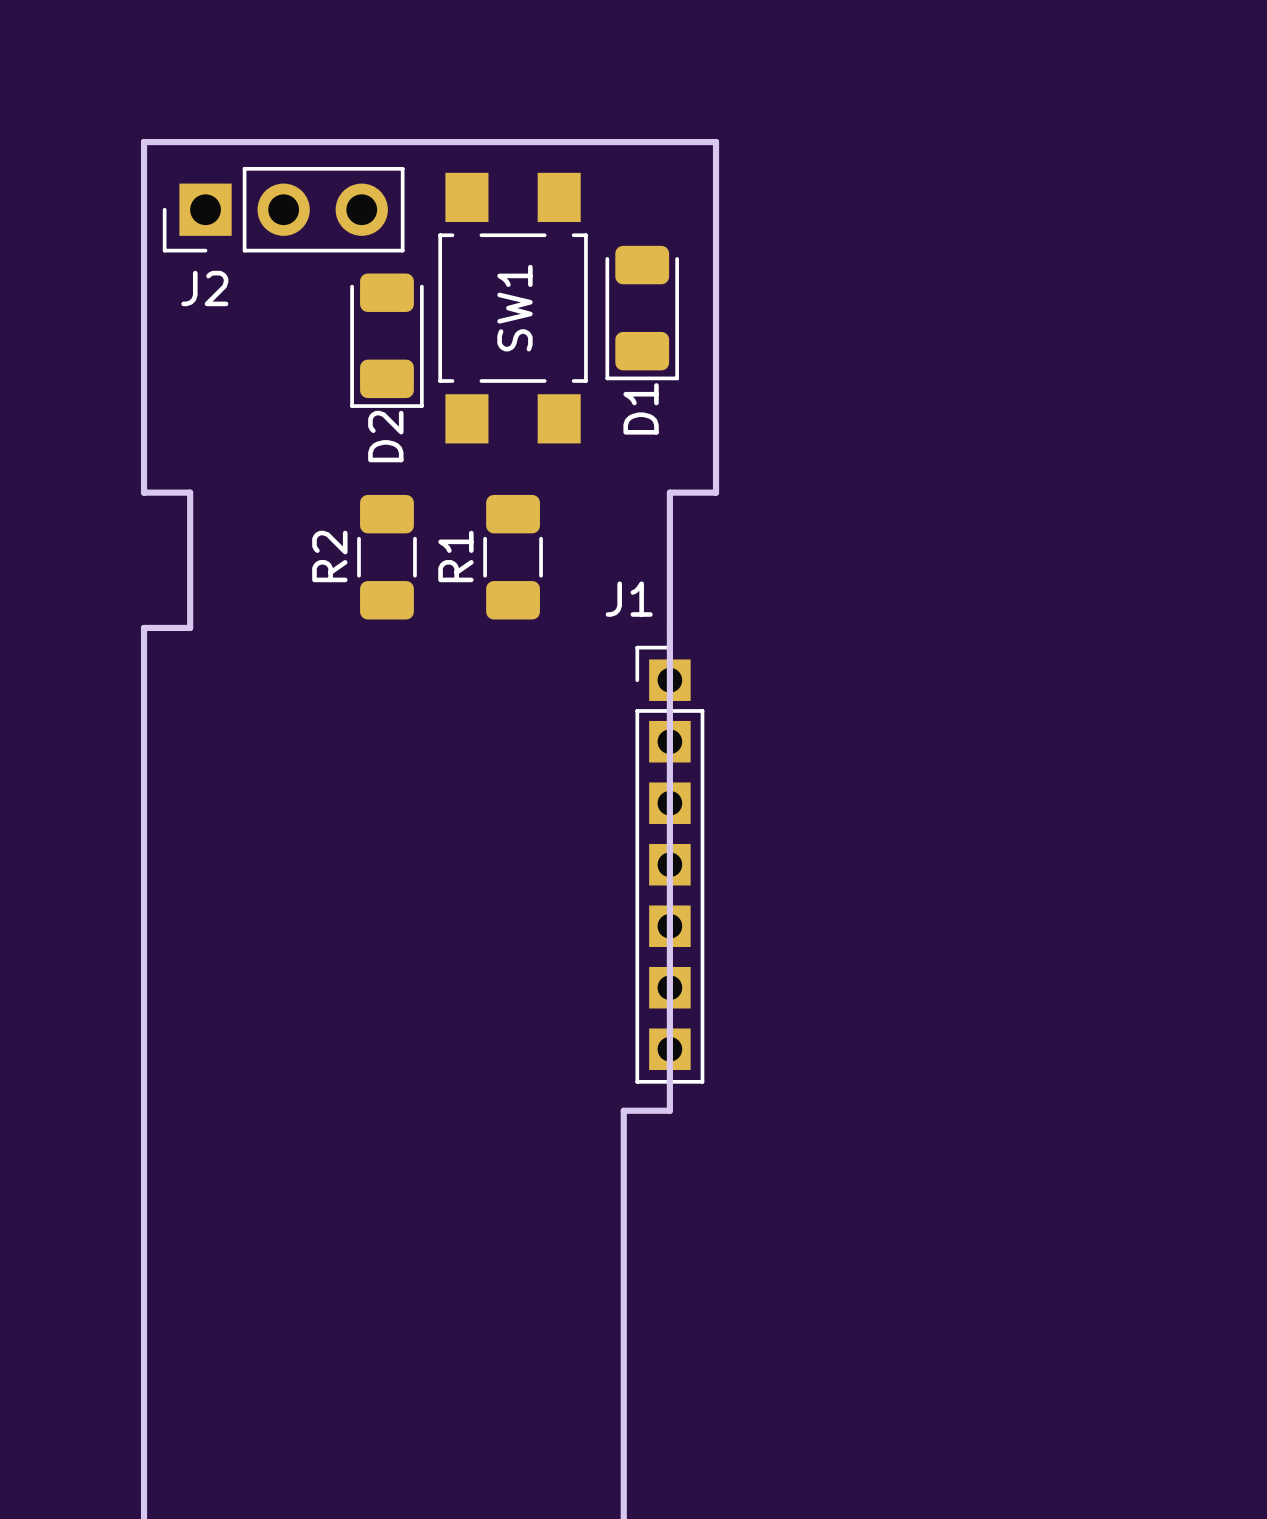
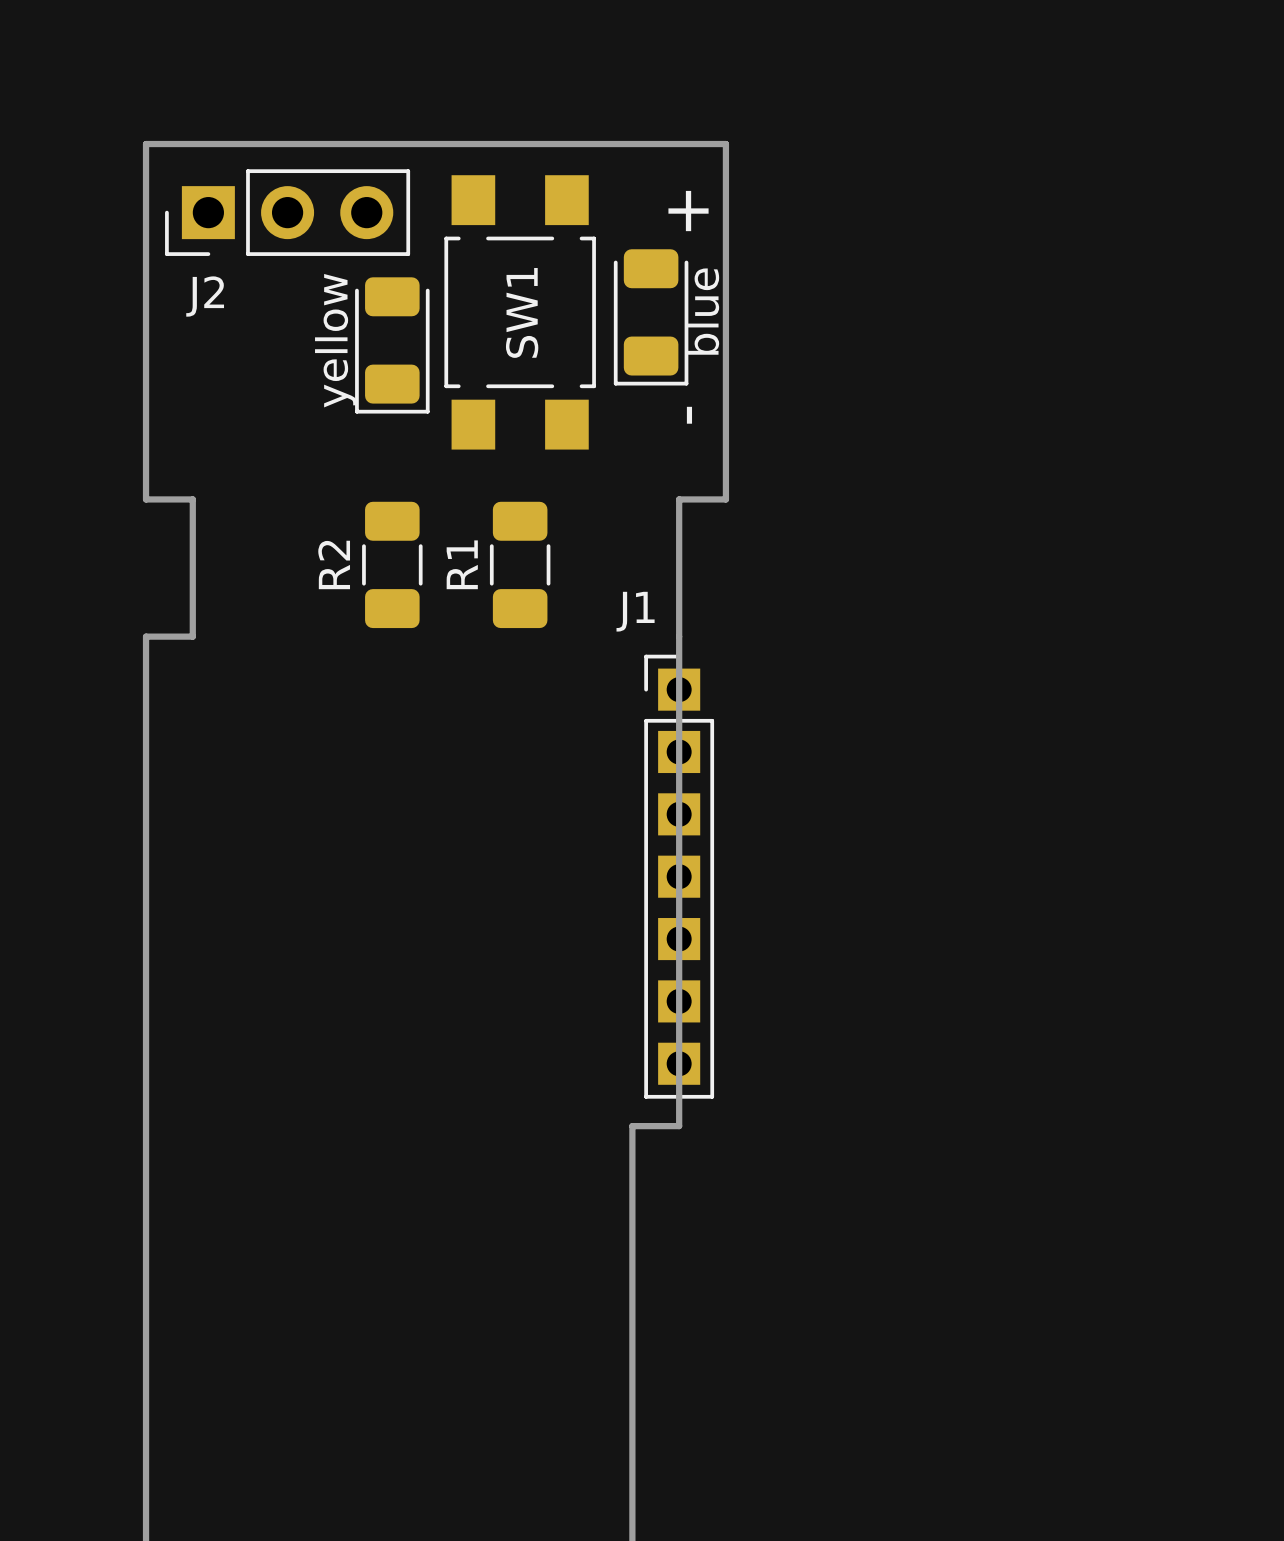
text: none -> + (688, 211)
D1 name: D1 (641, 408) -> blue (702, 311)
text: none -> - (689, 415)
D2 name: D2 (385, 436) -> yellow (335, 340)

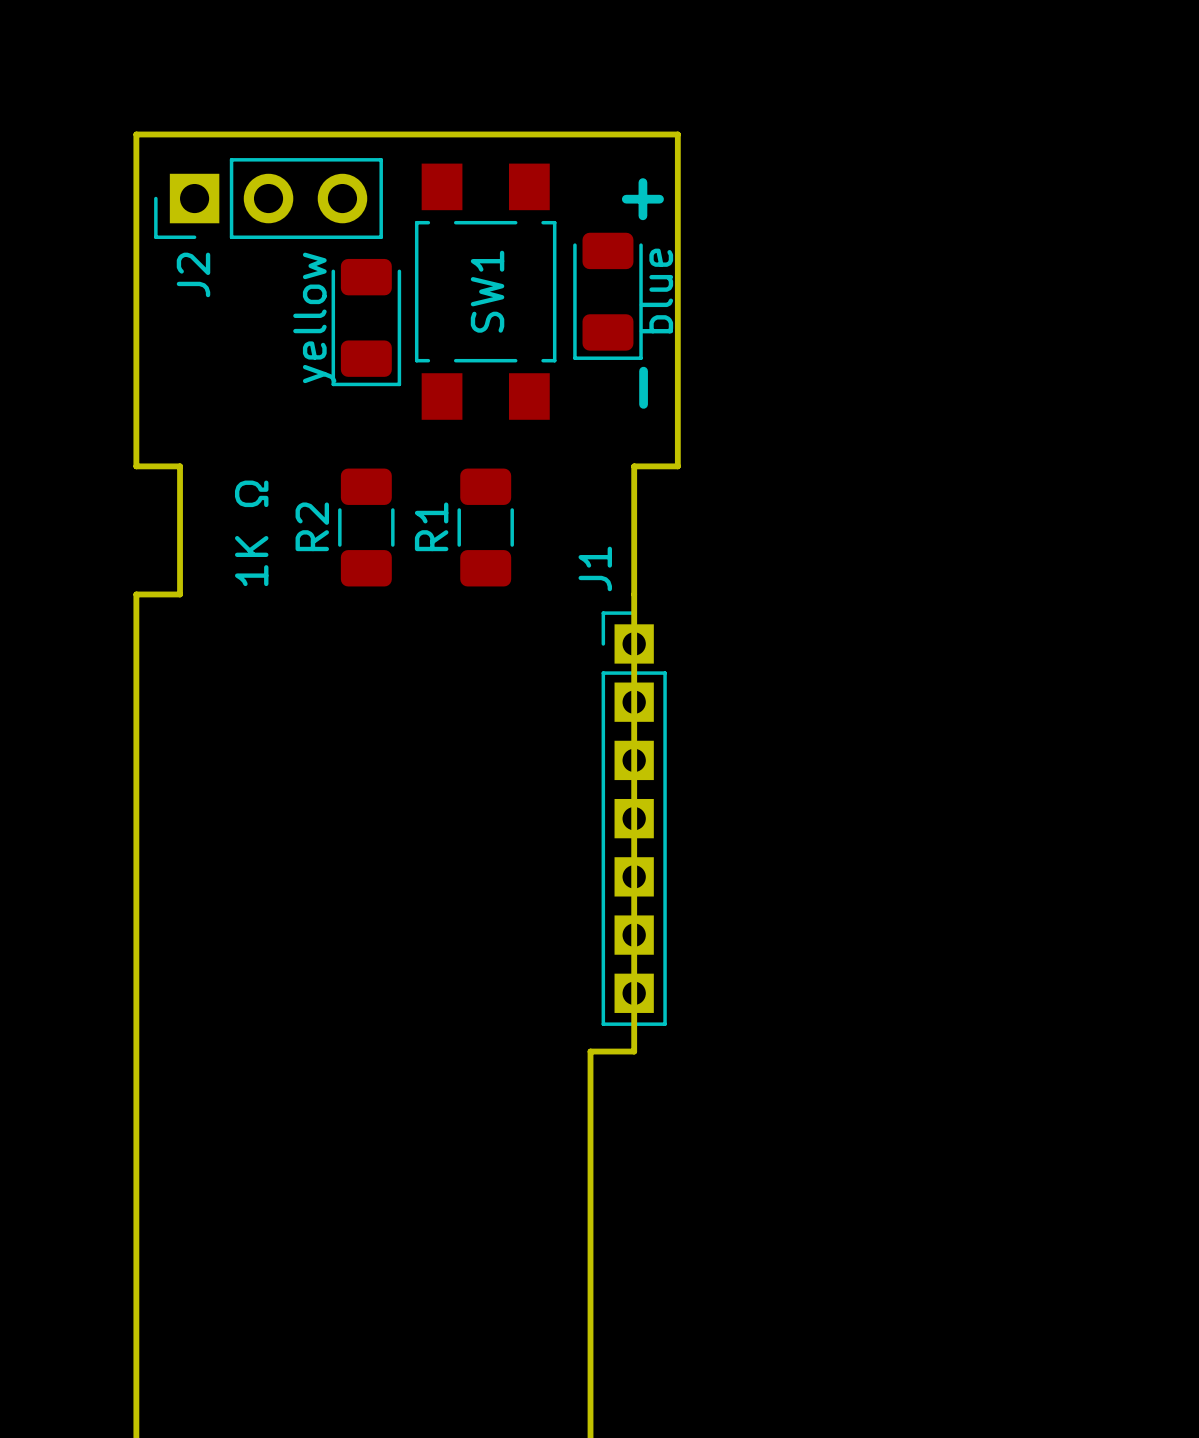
J2 name rotation: 0° (205, 296) -> 90° counterclockwise (193, 274)
text: none -> 1K Ω (251, 533)
J1 name rotation: 0° (635, 611) -> 90° counterclockwise (595, 568)

